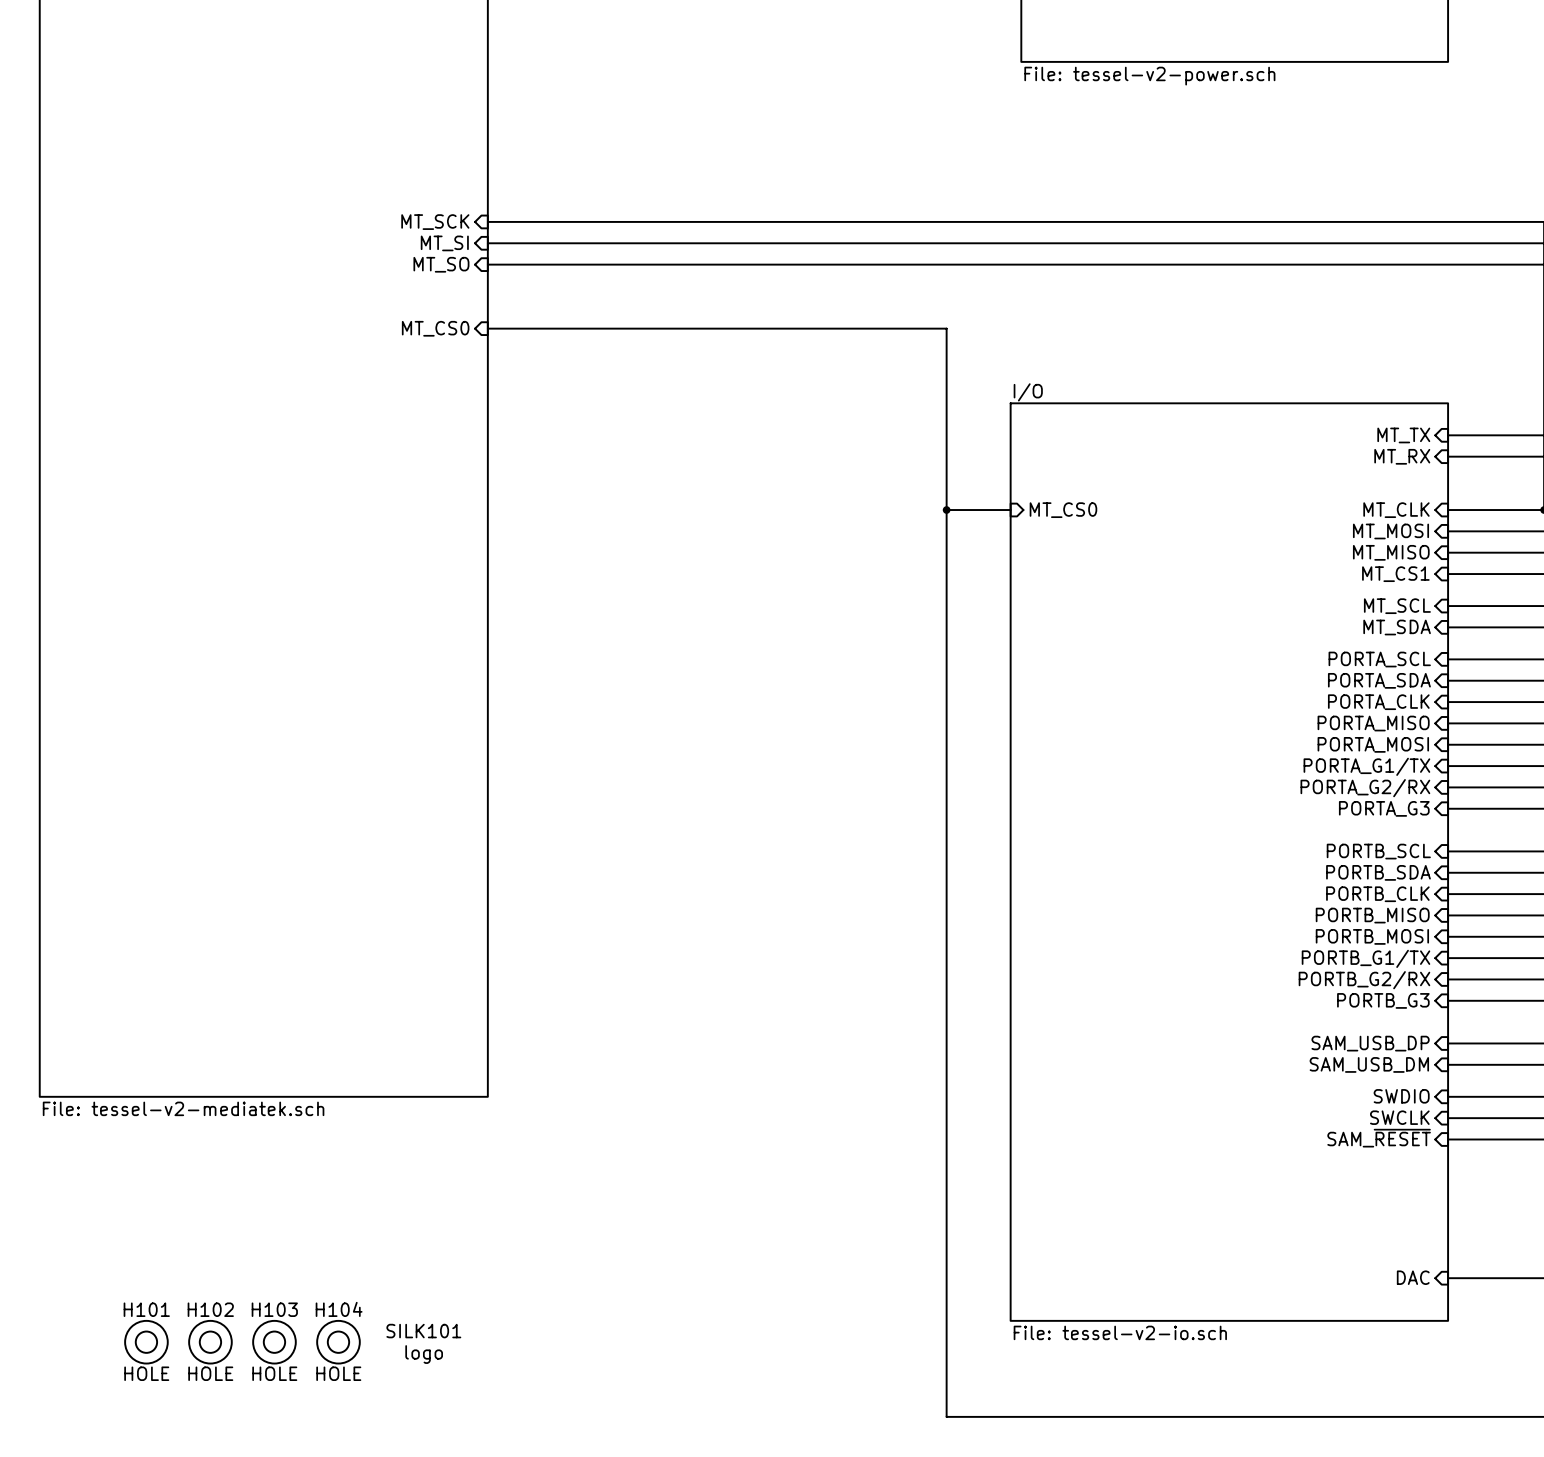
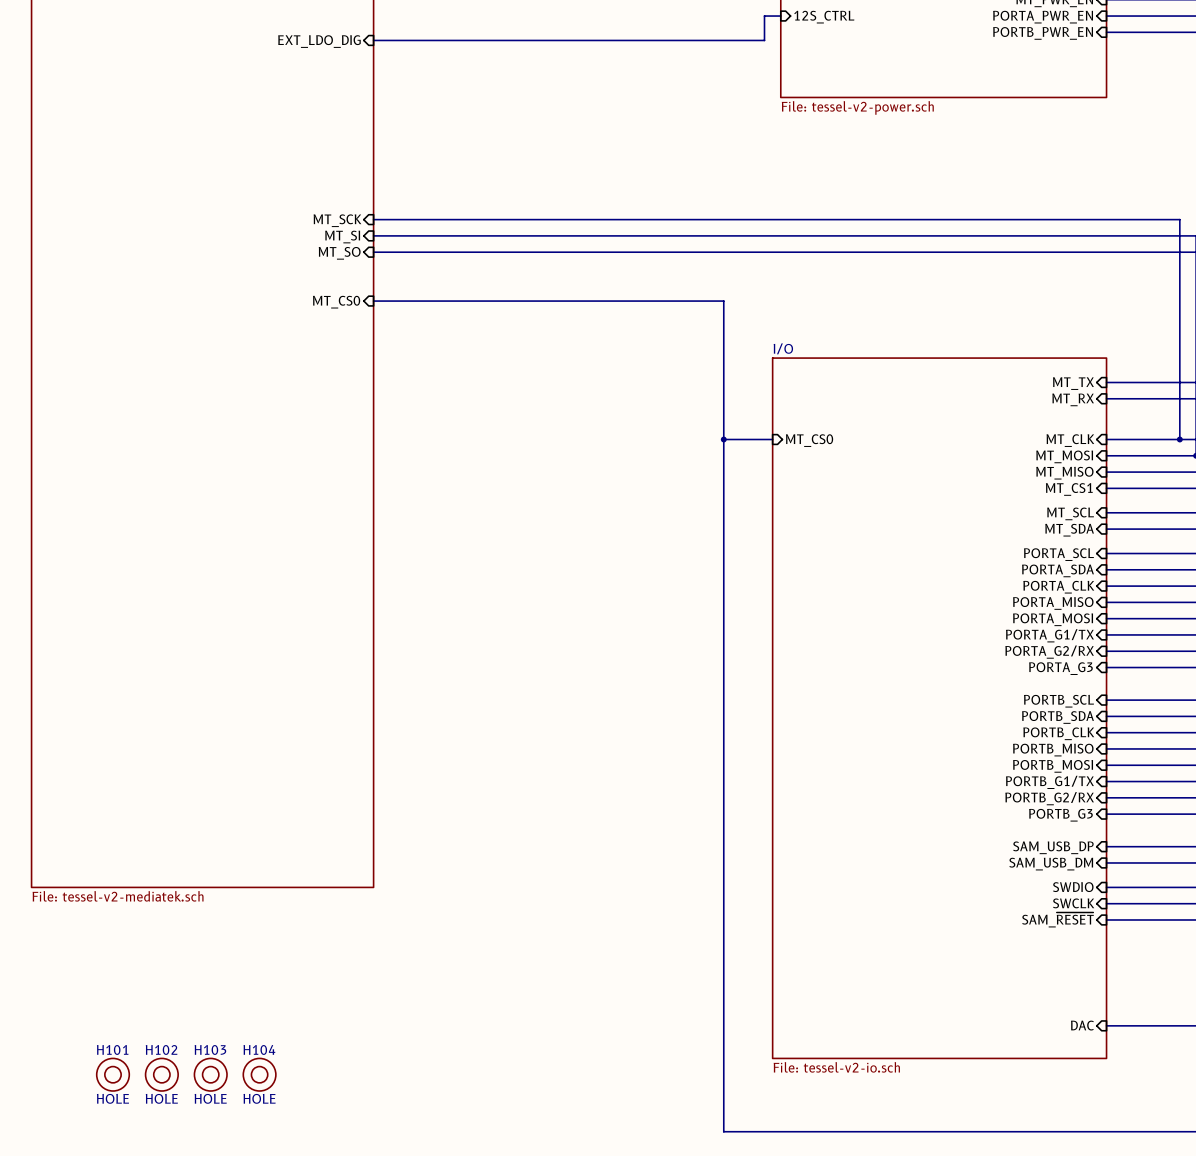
SILK101: logo (423, 1343) -> none

